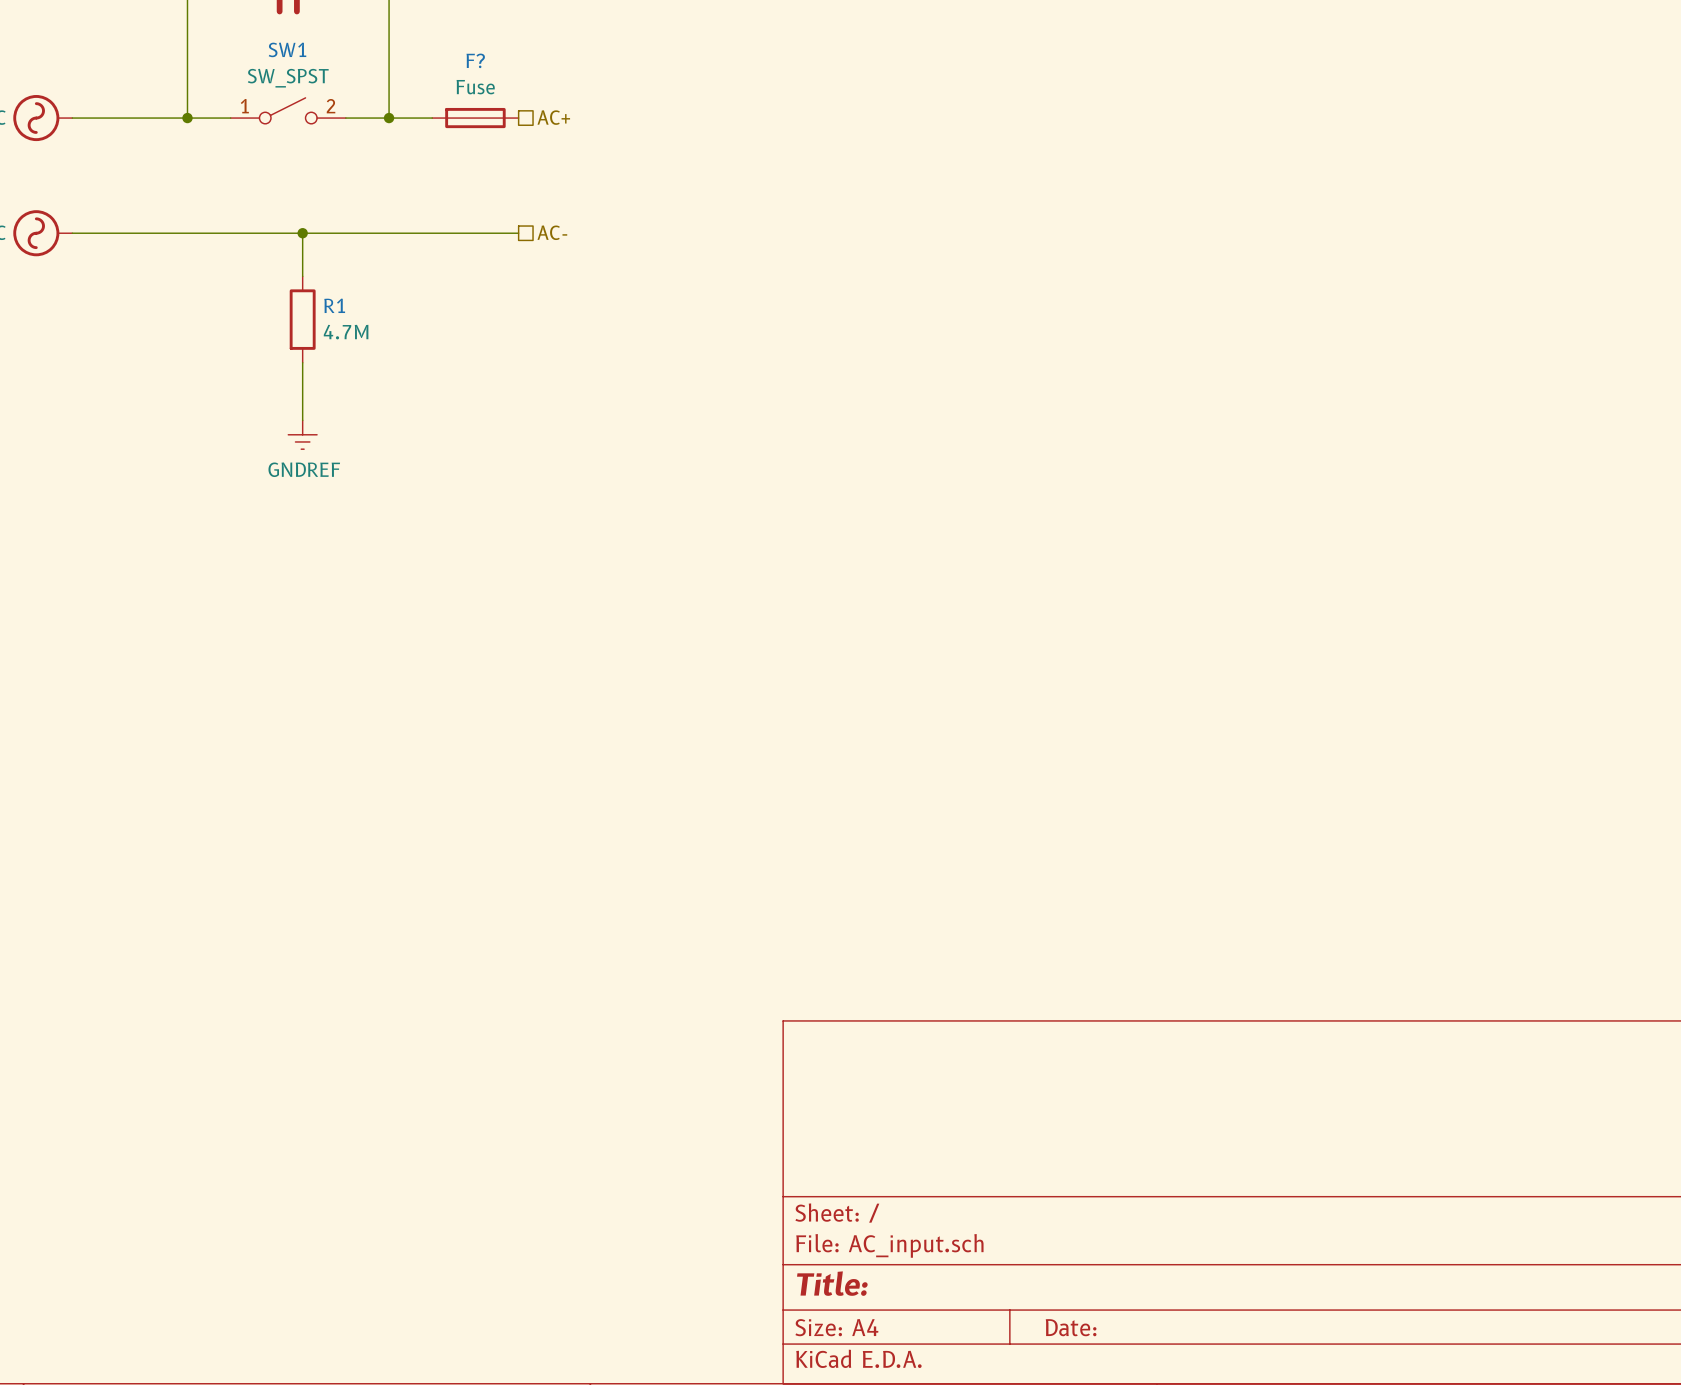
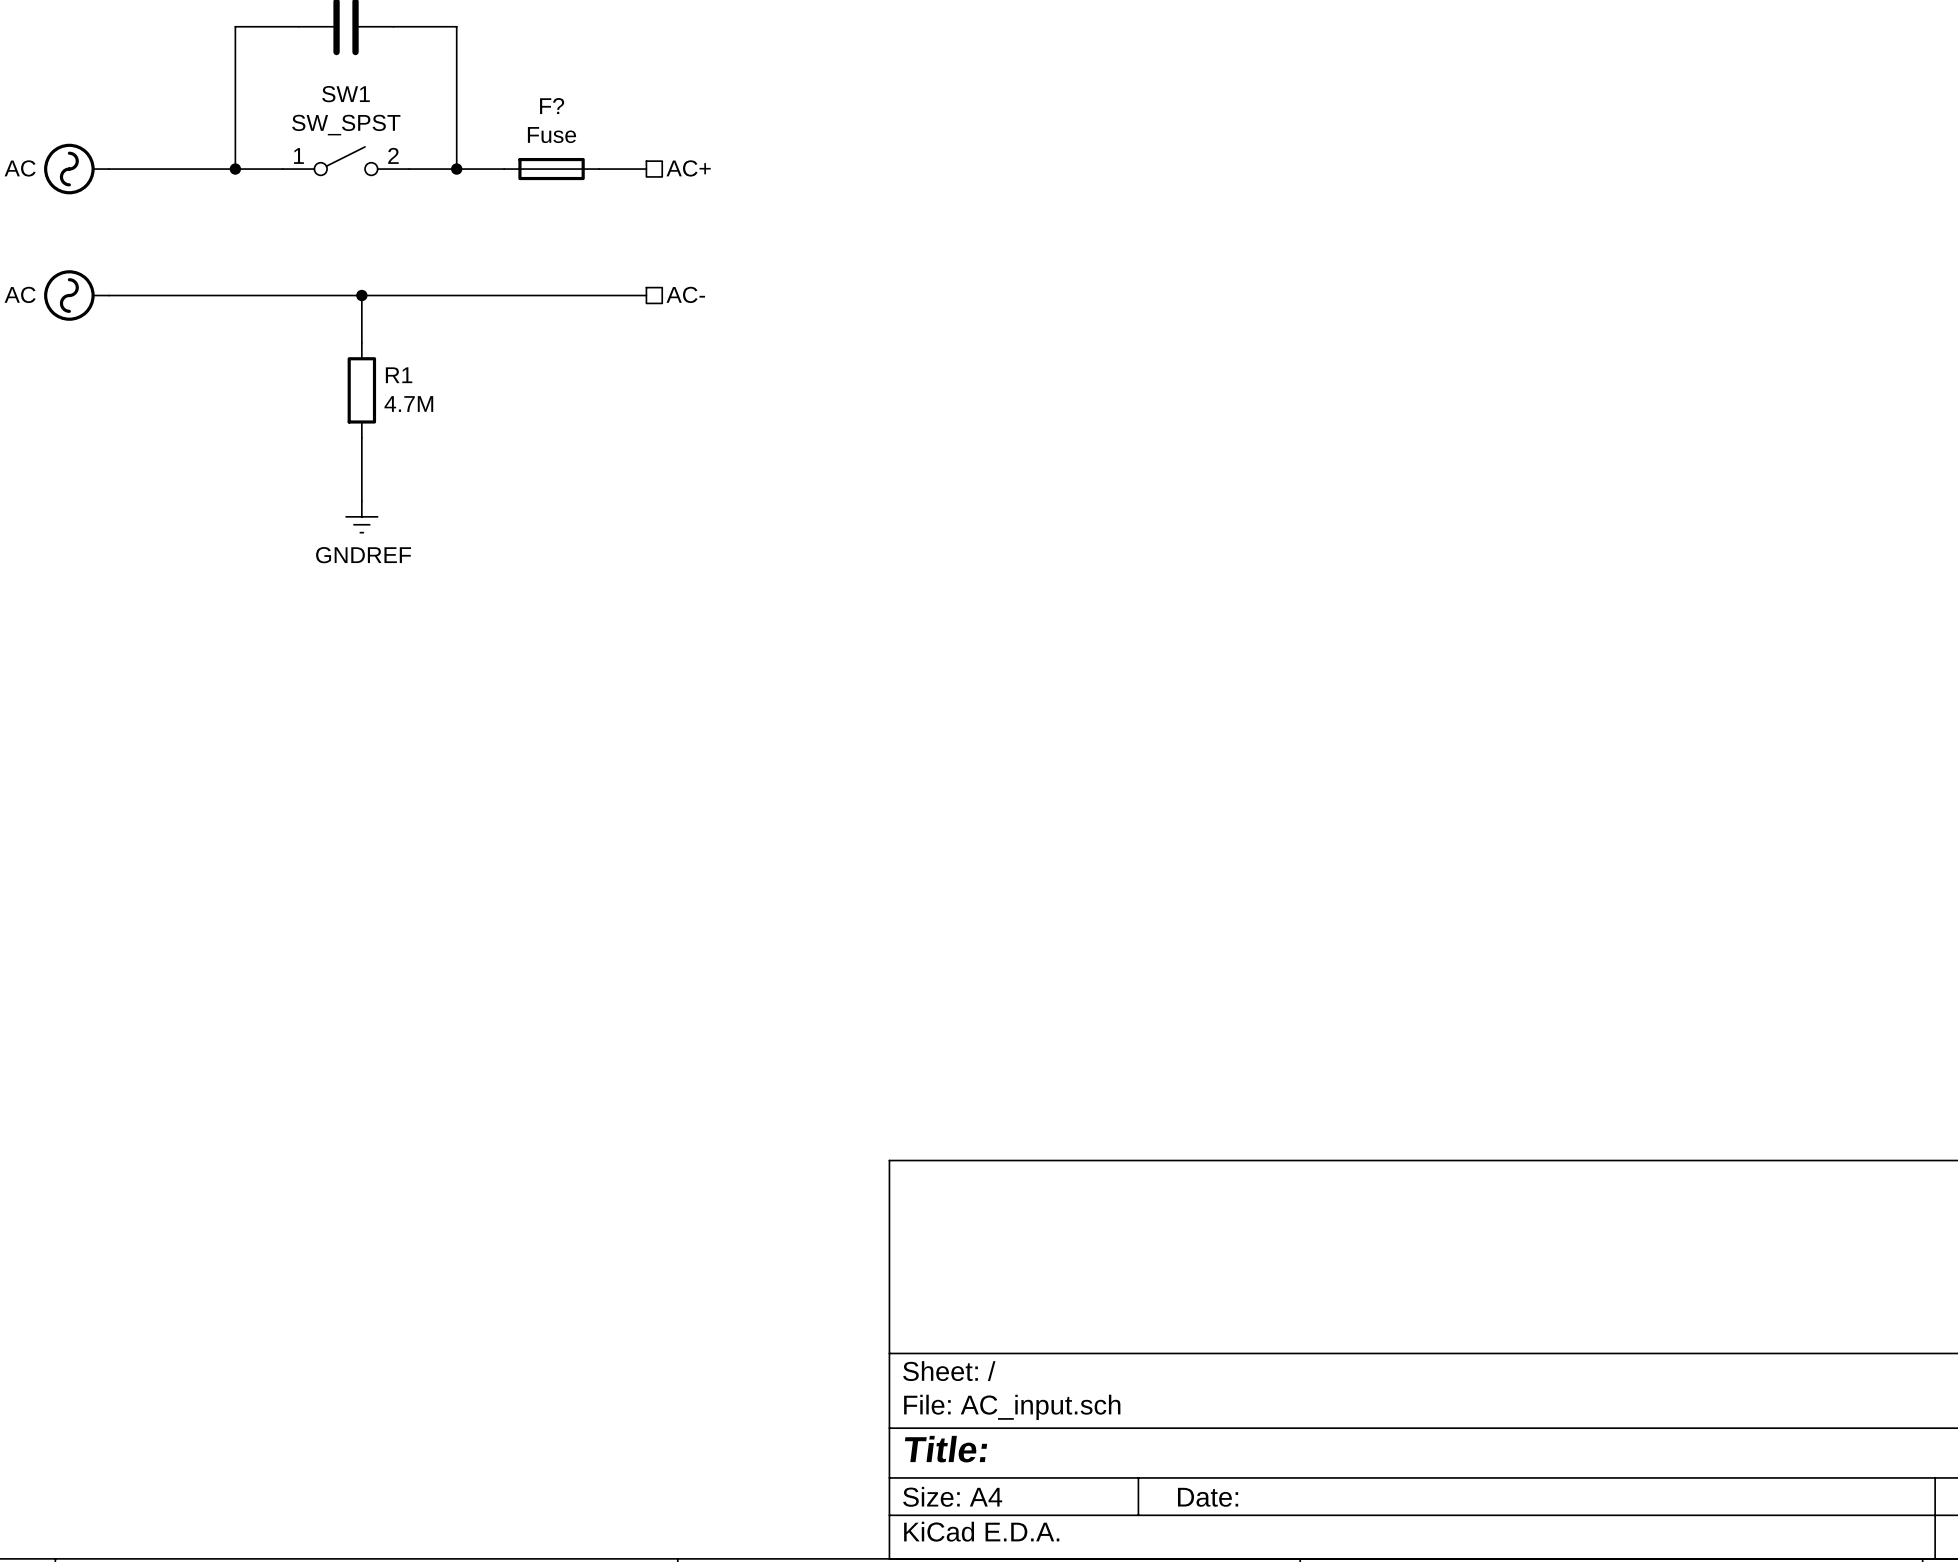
hierarchical label position: AC+ (553, 117) -> AC+ (688, 168)
wire: none -> (598, 169) (646, 169)
hierarchical label position: AC- (552, 232) -> AC- (685, 294)
wire: none -> (598, 295) (646, 295)

